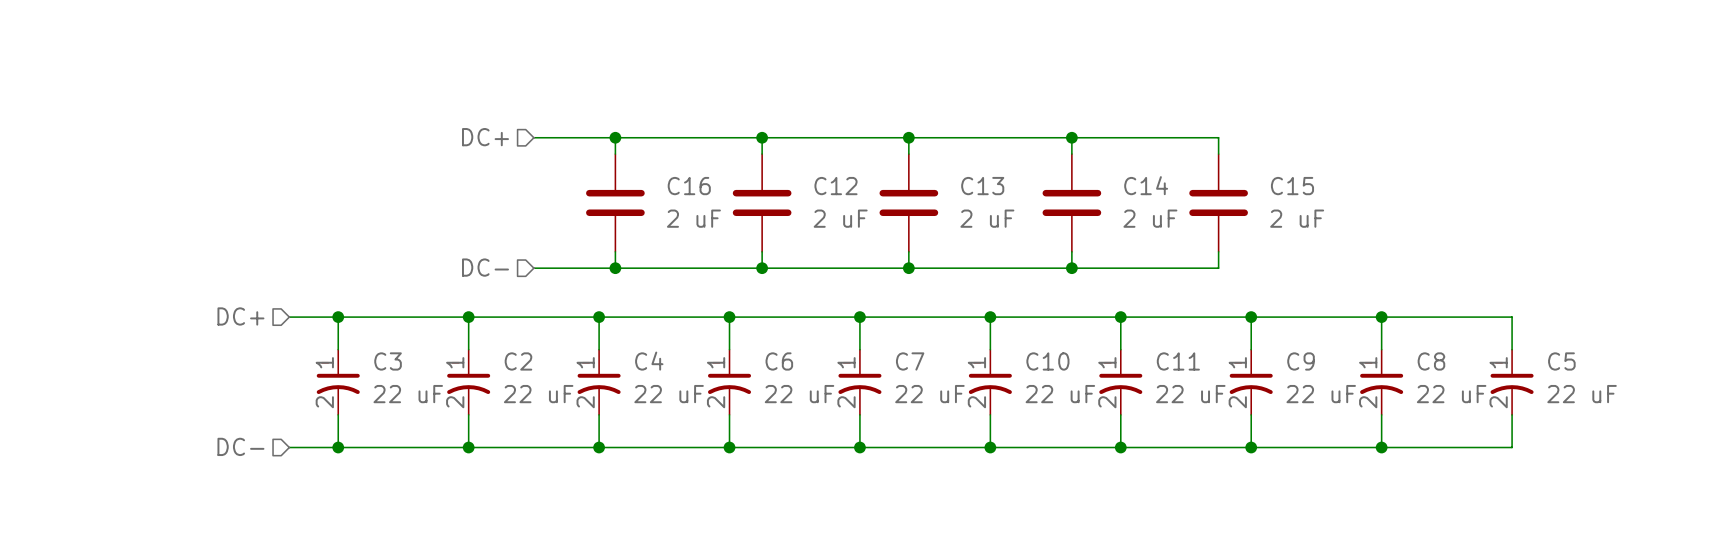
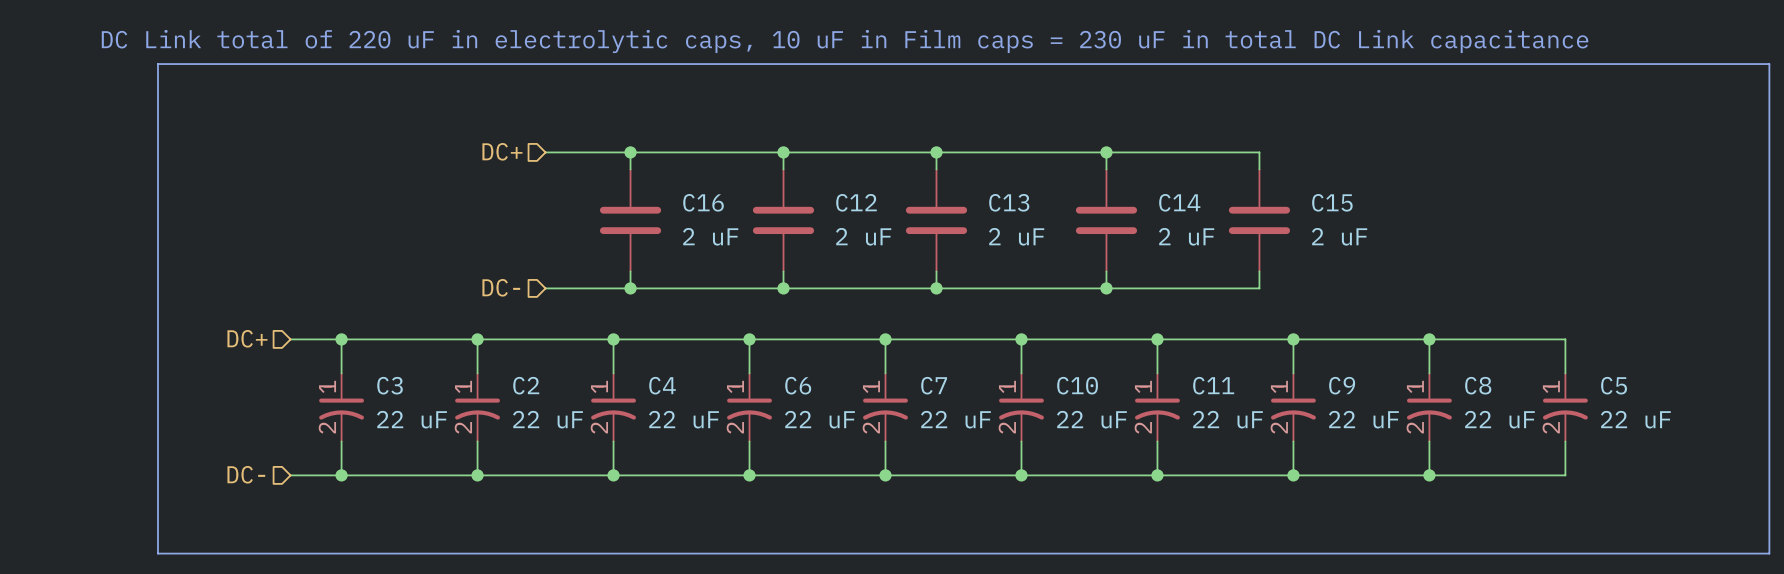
text: none -> DC Link total of 220 uF in electrolytic caps, 10 uF in Film caps = 230 uF in total DC Link capacitance (845, 41)
line: none -> (157, 64) (1769, 64) (1769, 553) (157, 553) (157, 64)

